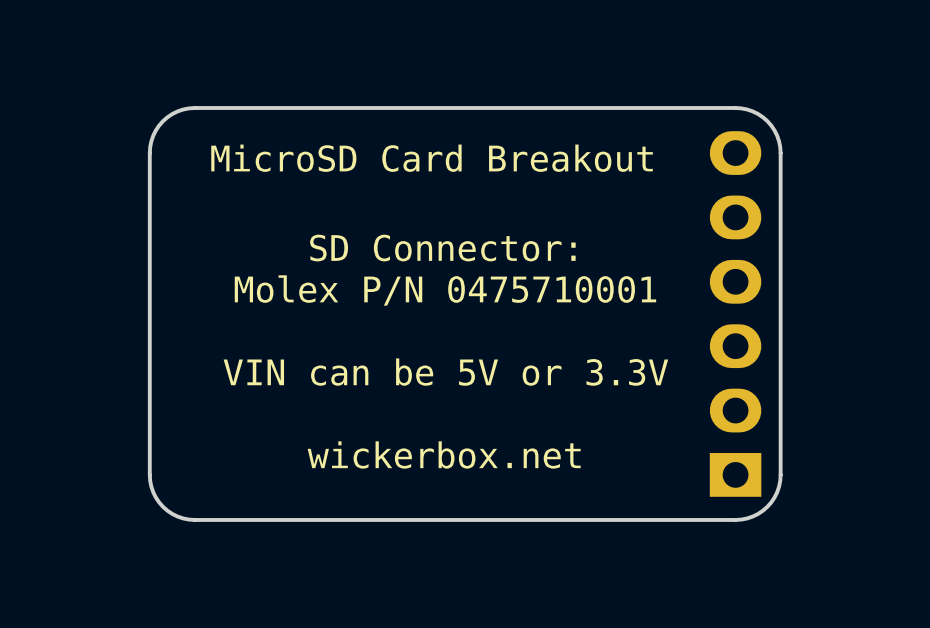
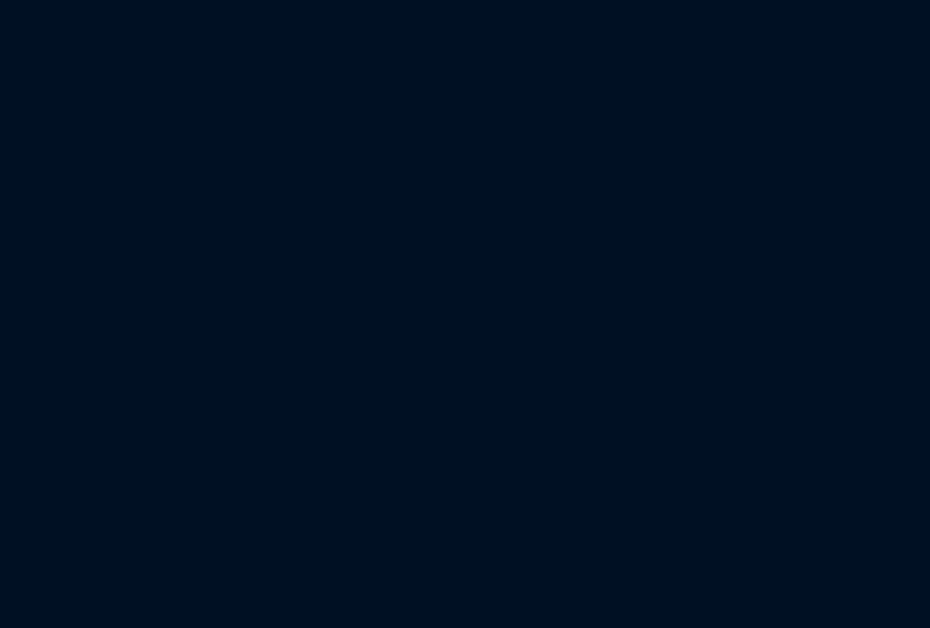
board edge: (735, 107) (194, 107) (183, 109) (167, 117) (155, 130) (151, 141) (149, 153) (149, 474) (153, 492) (159, 502) (172, 513) (183, 518) (194, 519) (735, 519) (747, 518) (763, 510) (774, 497) (779, 486) (780, 474) (780, 147) (777, 135) (767, 121) (752, 111) (735, 107) -> none
text: MicroSD Card Breakout (432, 158) -> none
text: SD Connector: (442, 248) -> none
text: Molex P/N 0475710001 (445, 290) -> none
part: (735, 313) -> none
text: VIN can be 5V or 3.3V (445, 372) -> none
text: wickerbox.net (444, 454) -> none

